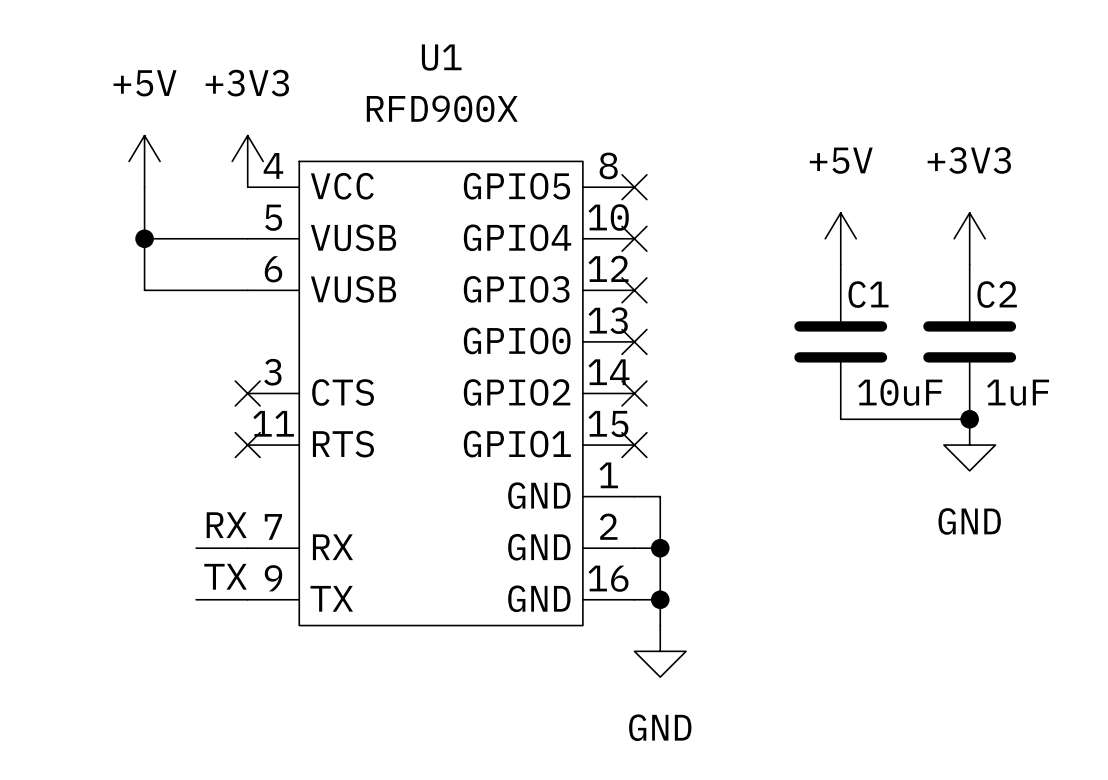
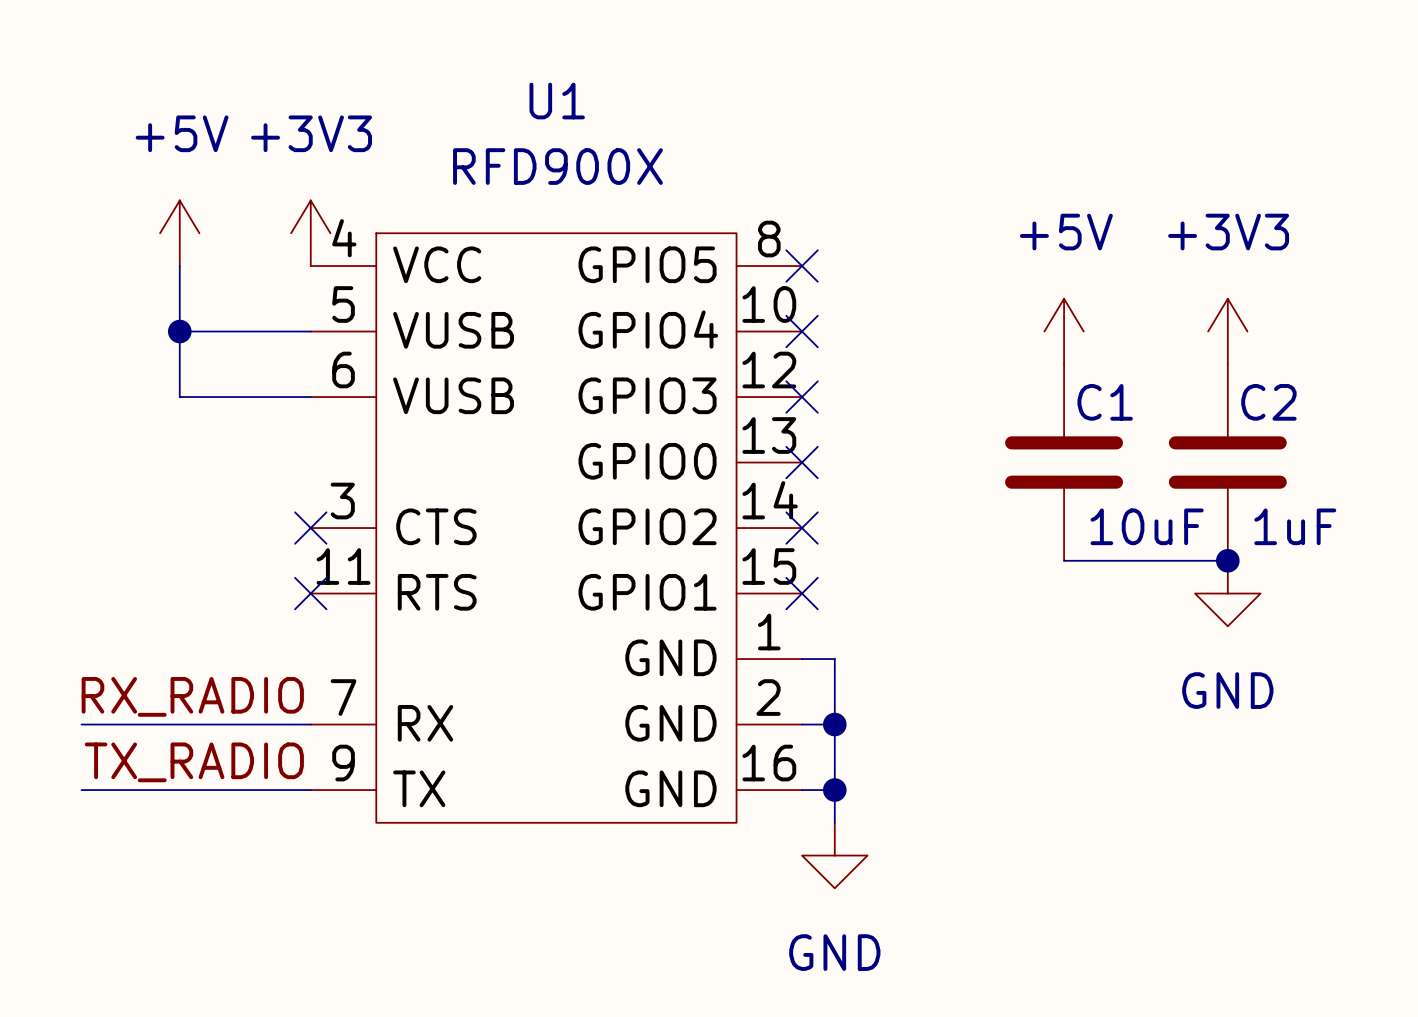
label: RX (226, 525) -> RX_RADIO (192, 696)
wire: none -> (81, 724) (245, 724)
label: TX (225, 576) -> TX_RADIO (194, 762)
wire: none -> (81, 790) (245, 790)

